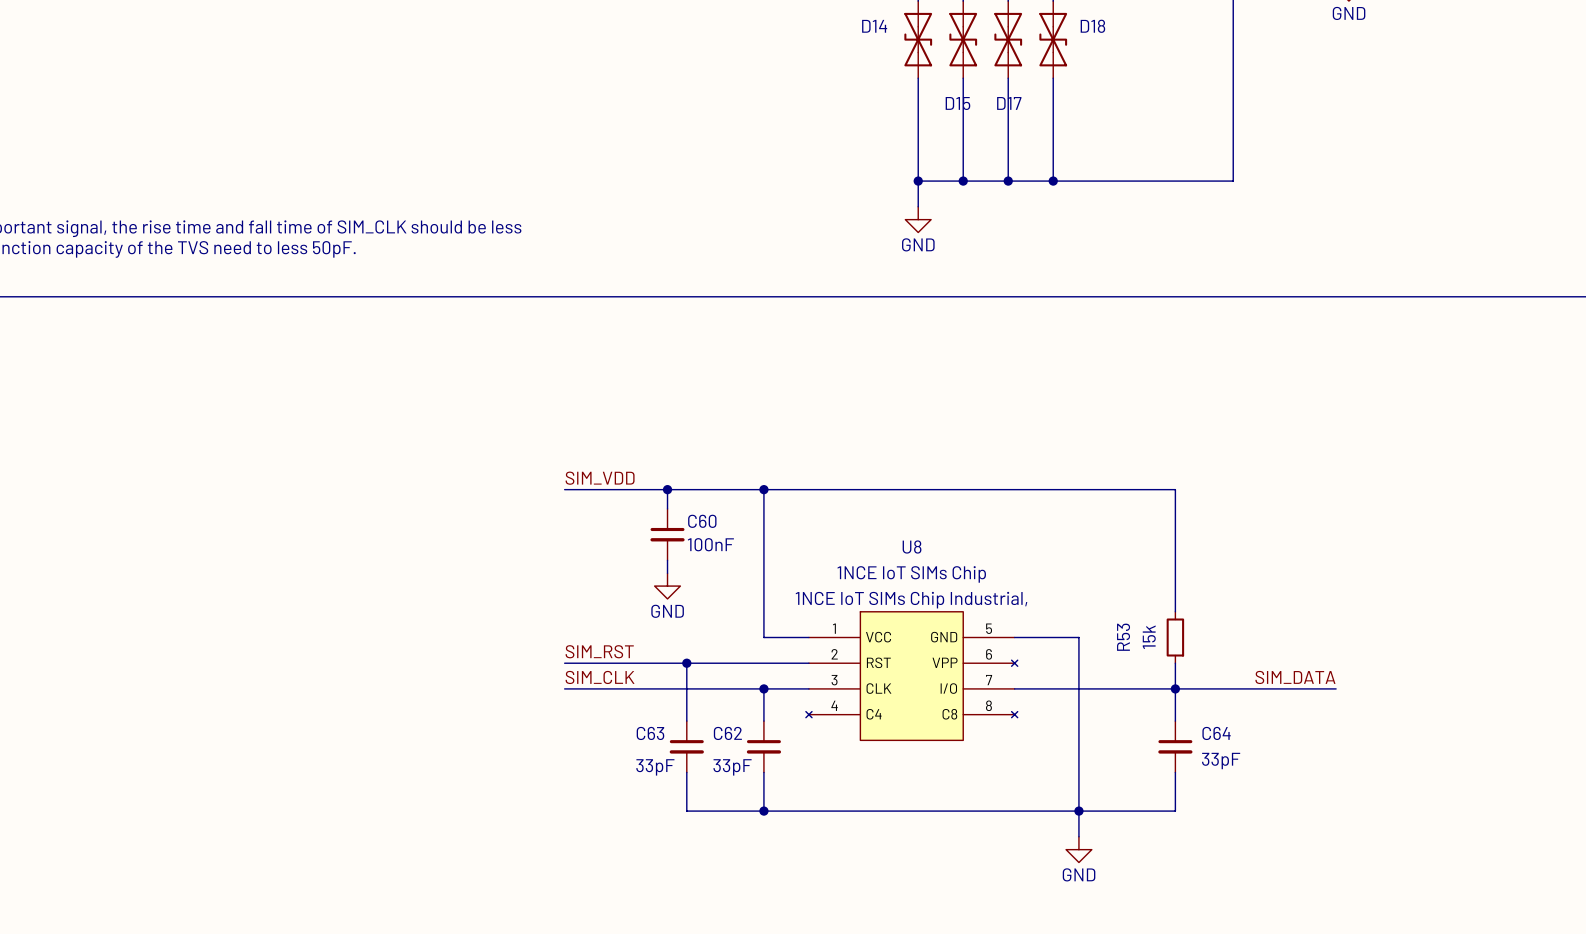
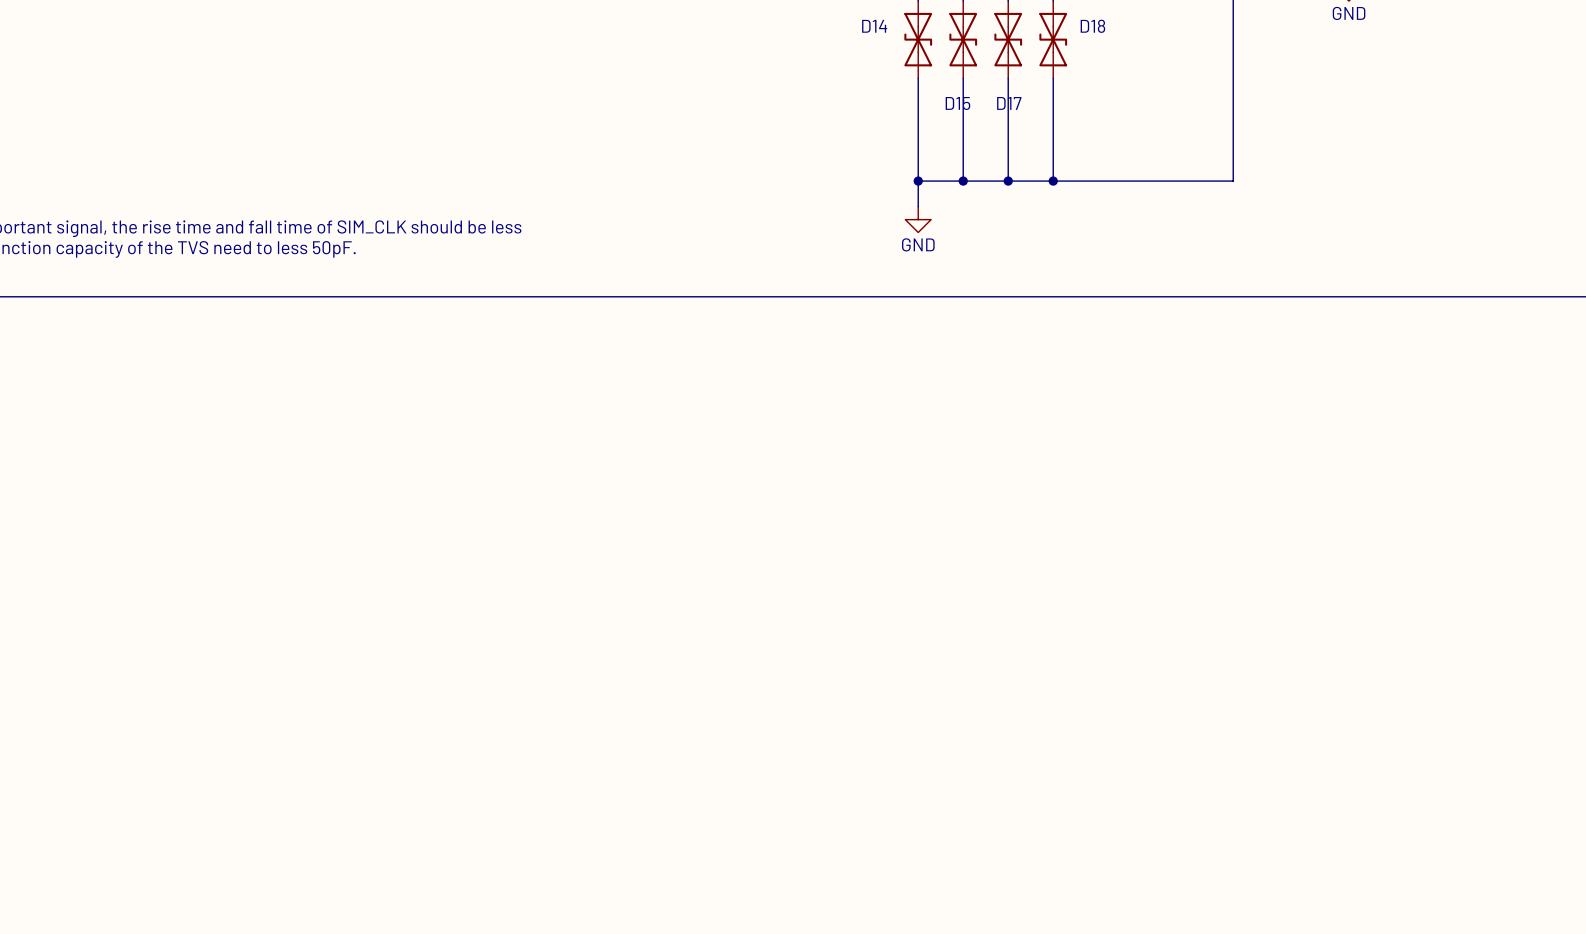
label: SIM_VDD (600, 478) -> none
wire: (564, 489) (1175, 489) (1175, 611) -> none
wire: (667, 489) (667, 508) -> none
junction: (667, 489) -> none
wire: (763, 489) (763, 637) (808, 637) -> none
junction: (763, 489) -> none
C60: 100nF (667, 534) -> none
wire: (667, 560) (667, 573) -> none
power symbol: GND (667, 586) -> none
wire: (1014, 637) (1078, 637) (1078, 836) -> none
R53: 15k (1175, 637) -> none
label: SIM_RST (599, 651) -> none
wire: (564, 663) (808, 663) -> none
wire: (686, 663) (686, 721) -> none
junction: (686, 663) -> none
wire: (1175, 663) (1175, 721) -> none
U8: 1NCE IoT SIMs Chip (911, 676) -> none
label: SIM_CLK (600, 677) -> none
label: SIM_DATA (1295, 677) -> none
wire: (564, 688) (808, 688) -> none
wire: (763, 688) (763, 721) -> none
junction: (763, 688) -> none
wire: (1014, 688) (1336, 688) -> none
junction: (1175, 688) -> none
C63: 33pF (686, 746) -> none
C62: 33pF (763, 746) -> none
C64: 33pF (1175, 746) -> none
wire: (686, 772) (686, 811) (1175, 811) (1175, 772) -> none
wire: (763, 772) (763, 811) -> none
junction: (763, 811) -> none
junction: (1078, 811) -> none
power symbol: GND (1078, 849) -> none

